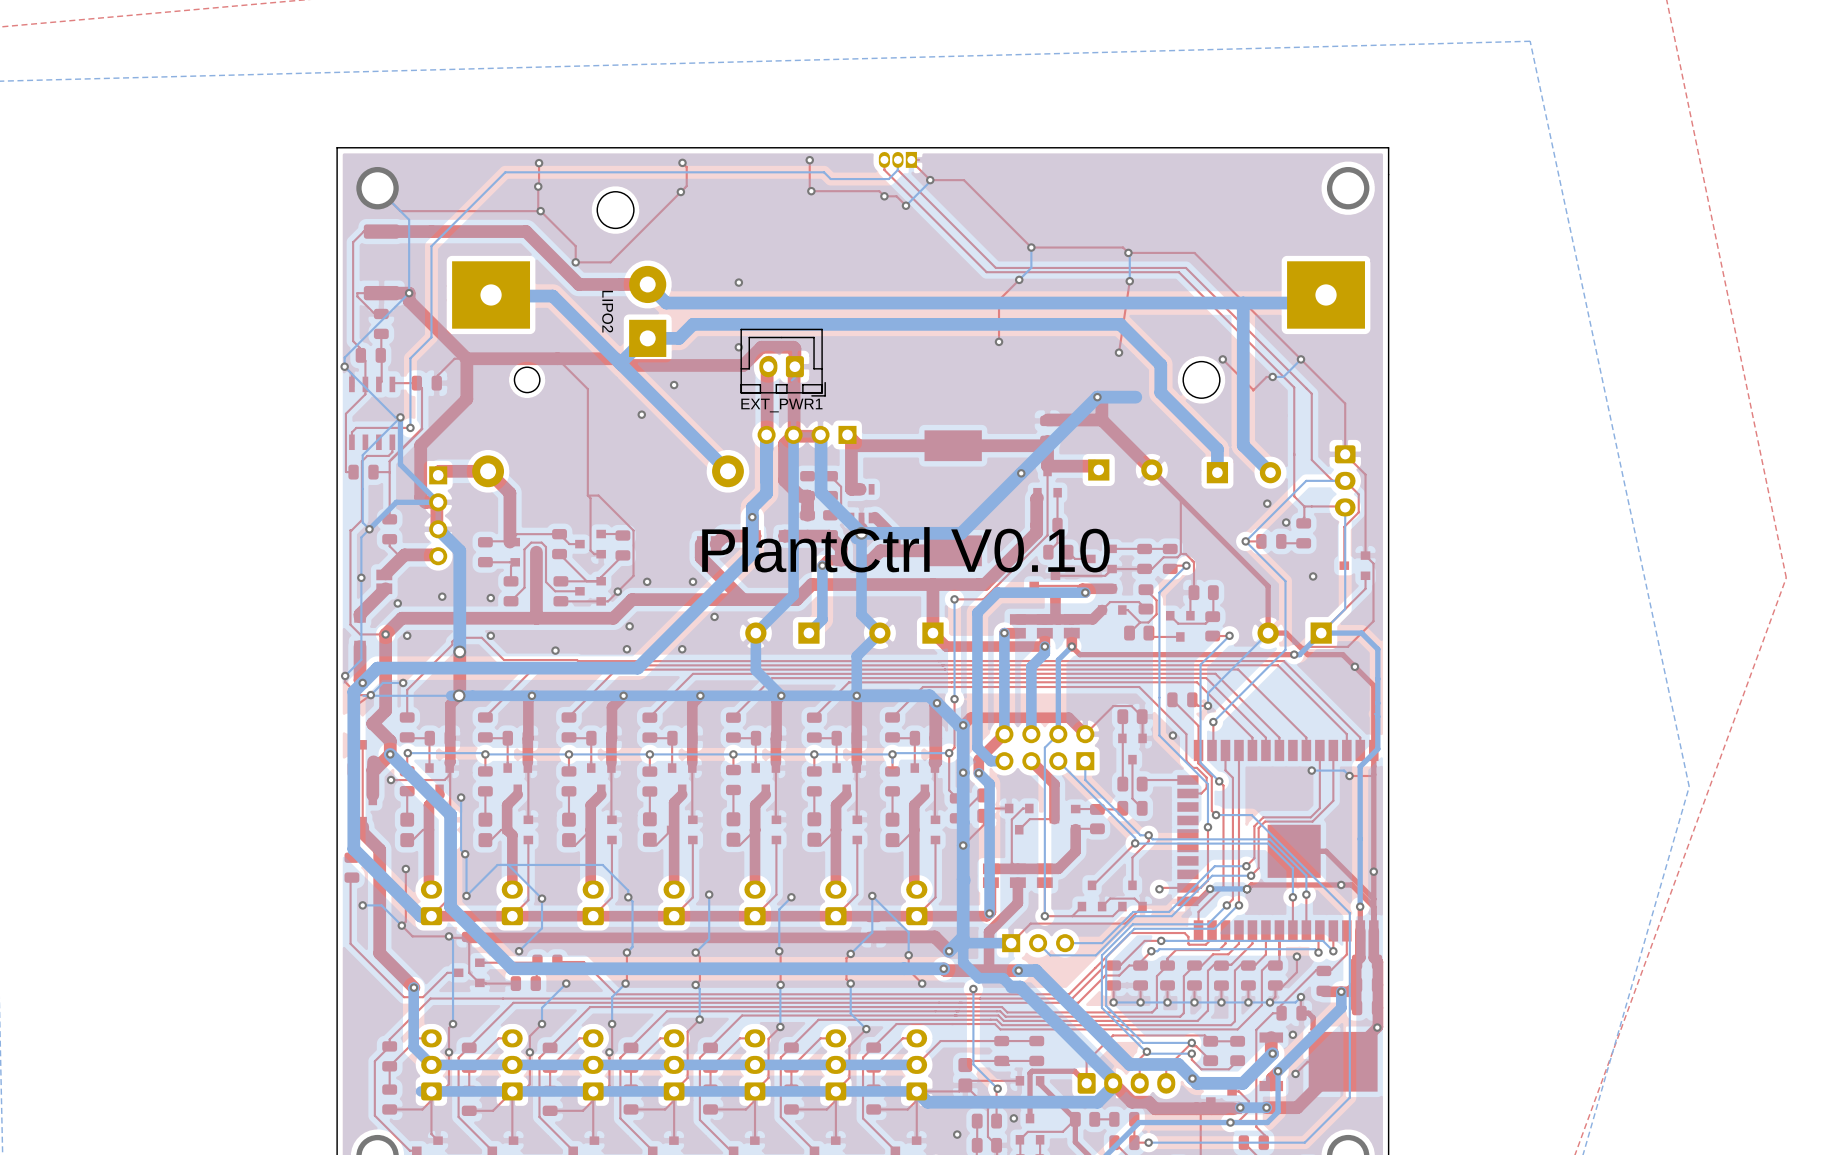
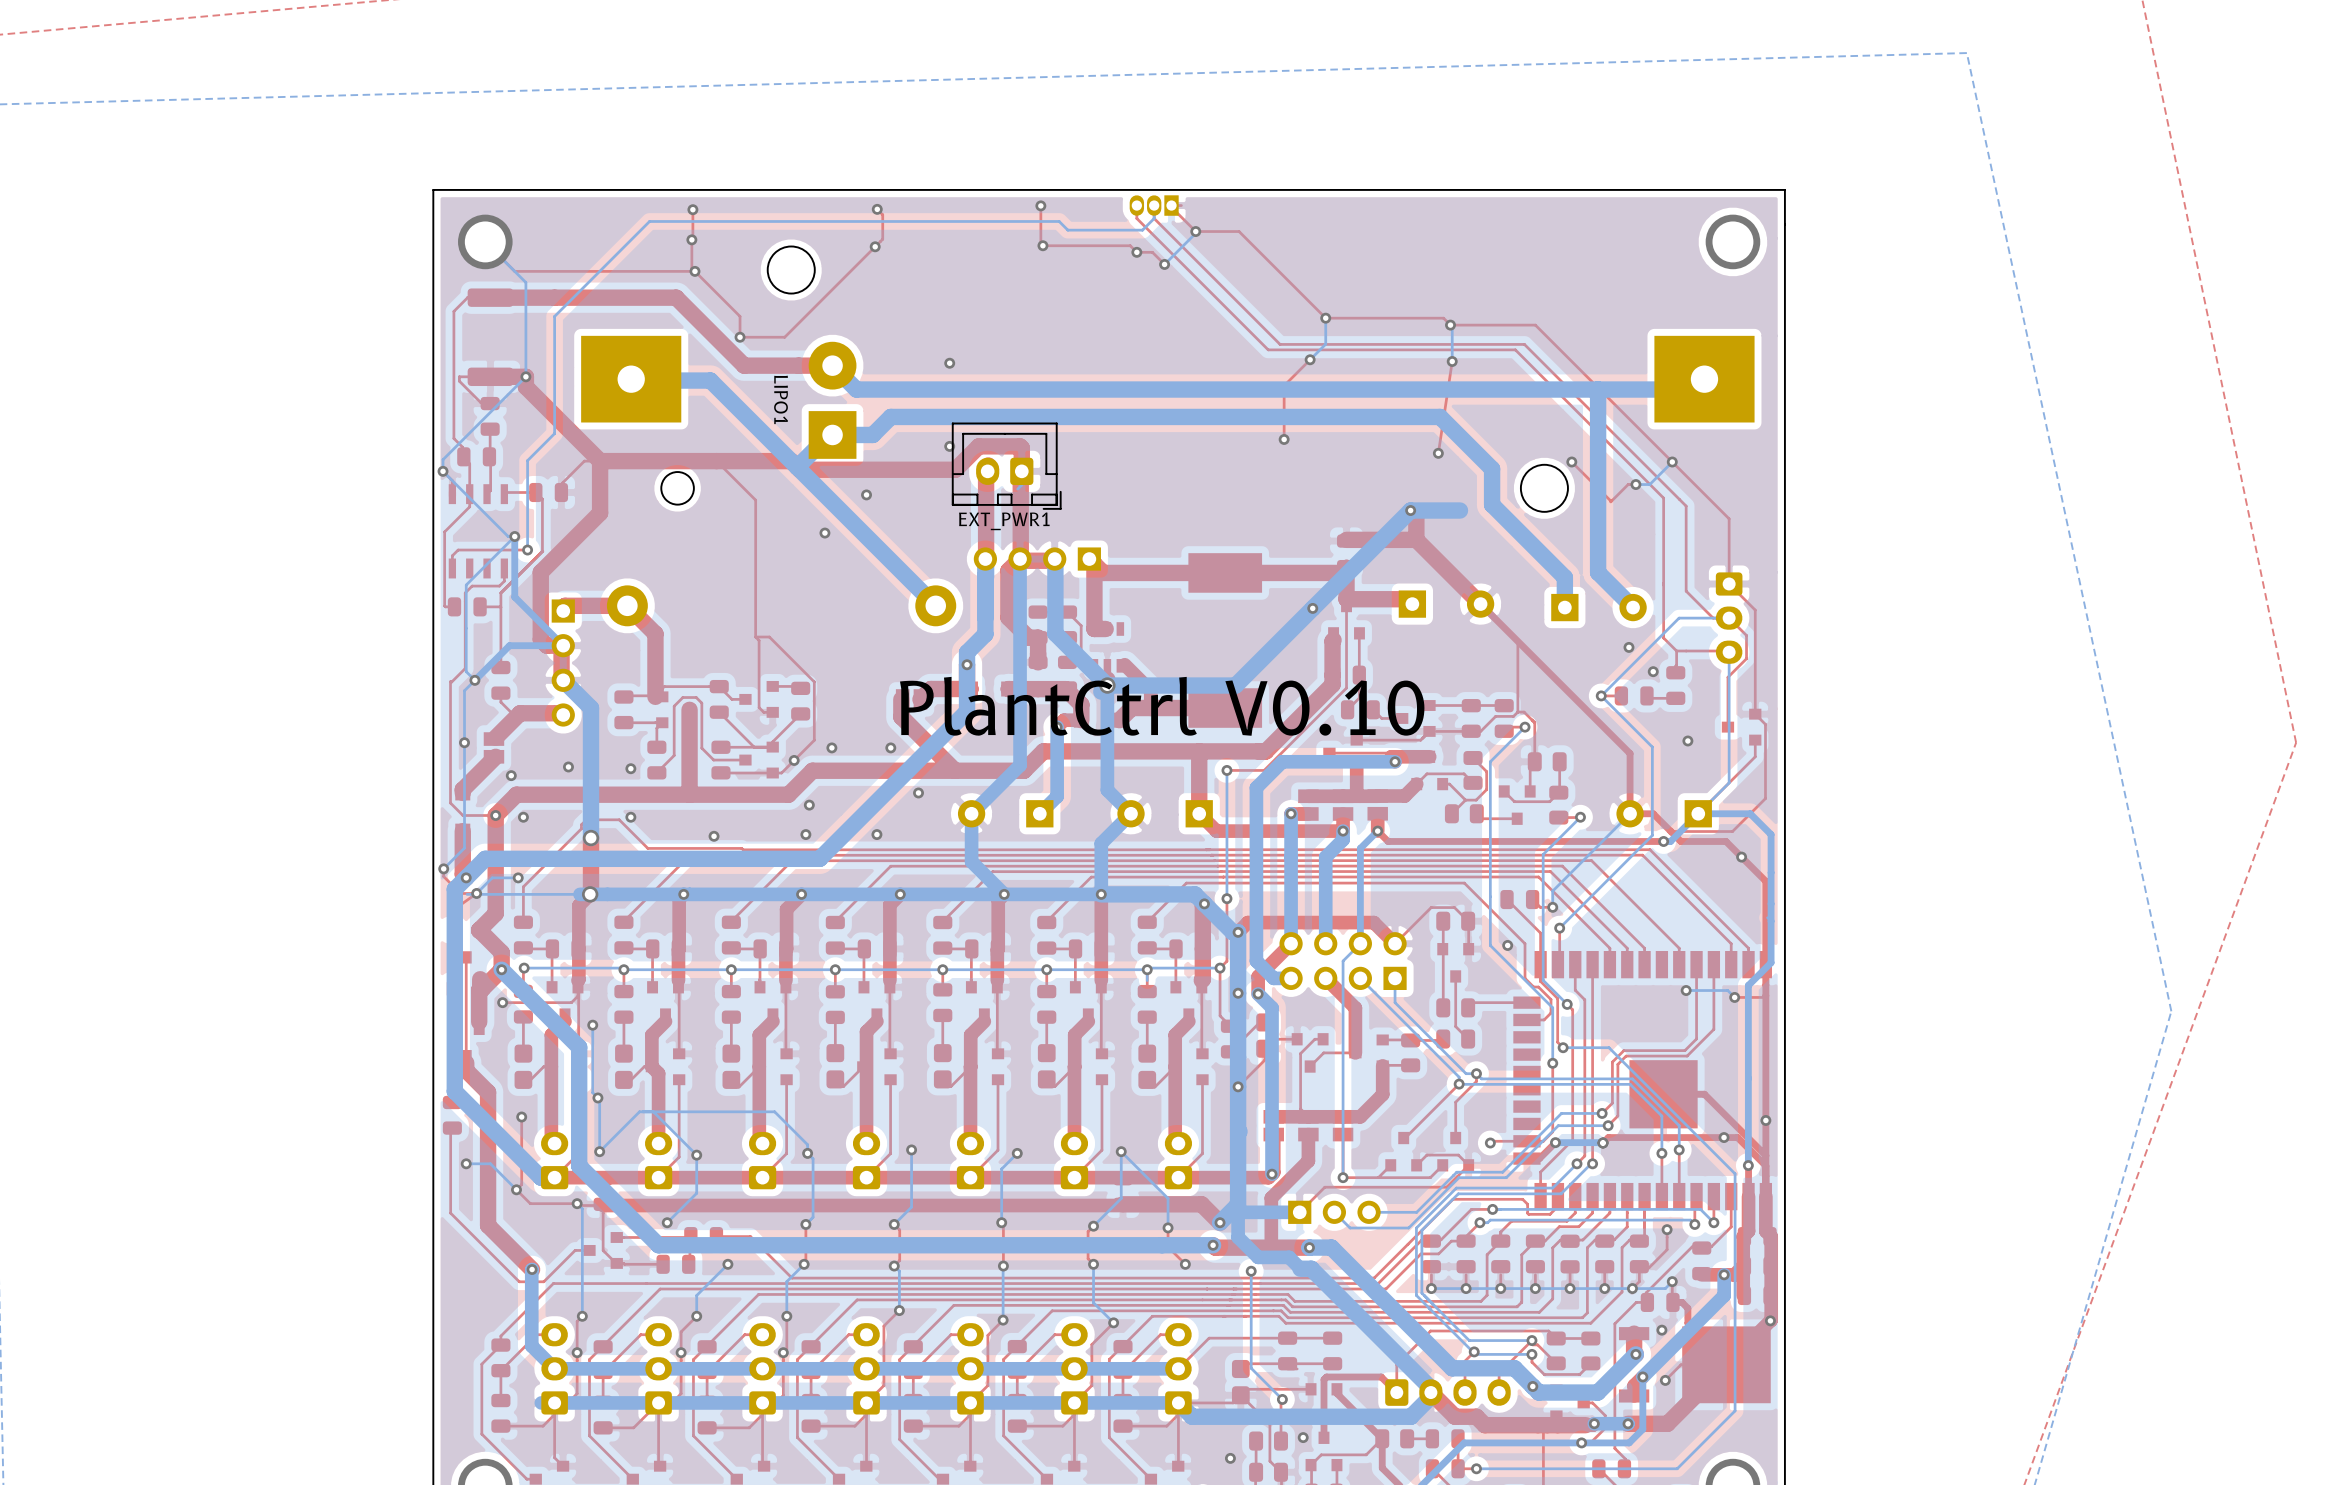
LIPO2 name: LIPO2 (607, 311) -> LIPO1 (781, 399)

